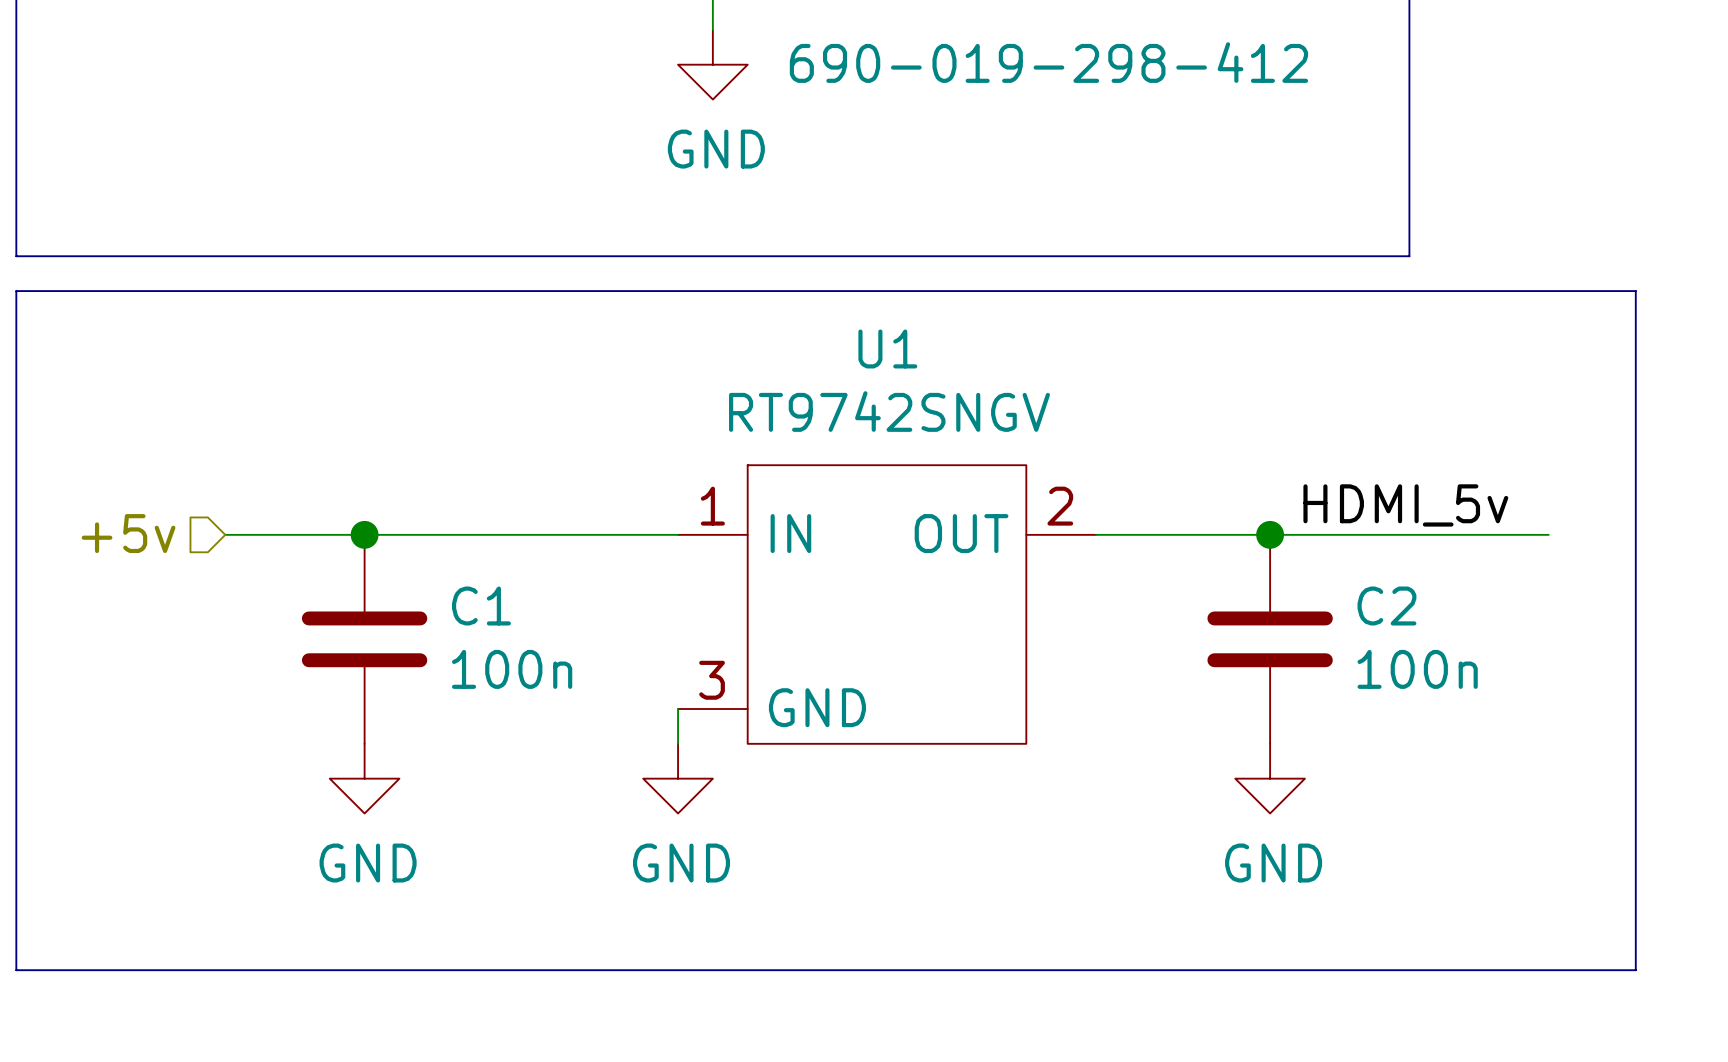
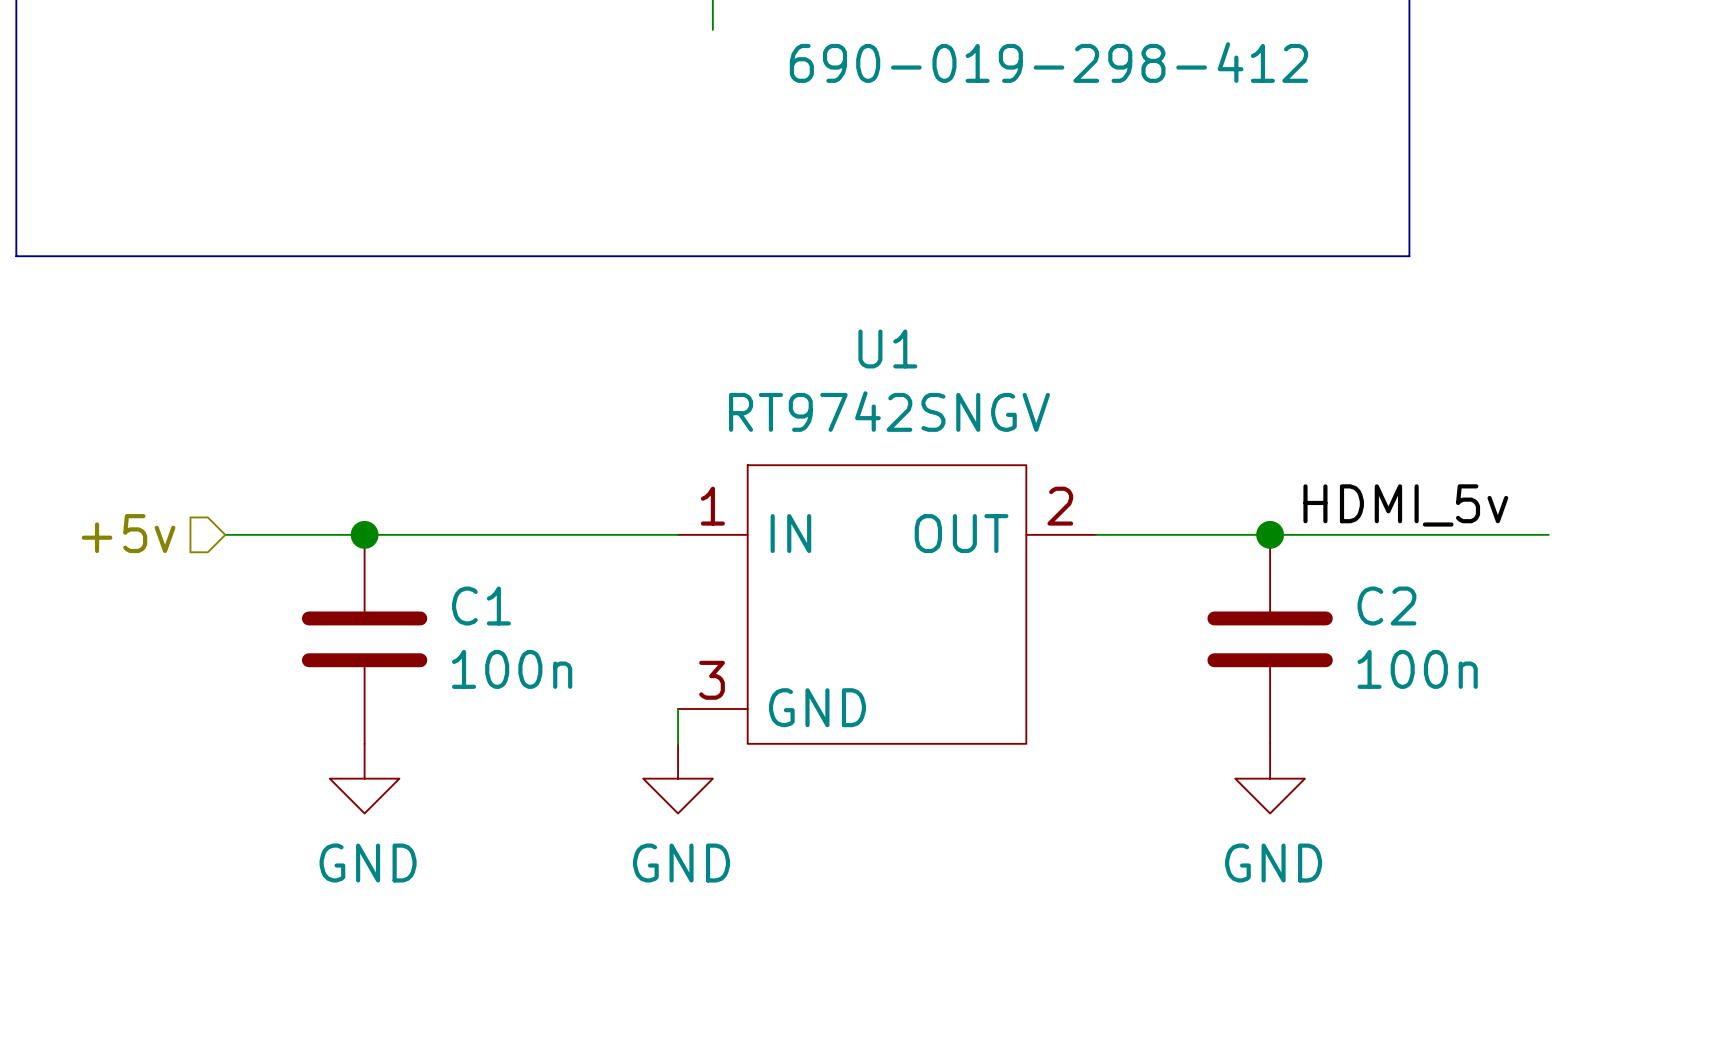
power symbol: GND (712, 64) -> none
line: (16, 291) (16, 970) (1635, 970) (1635, 291) (16, 291) -> none

